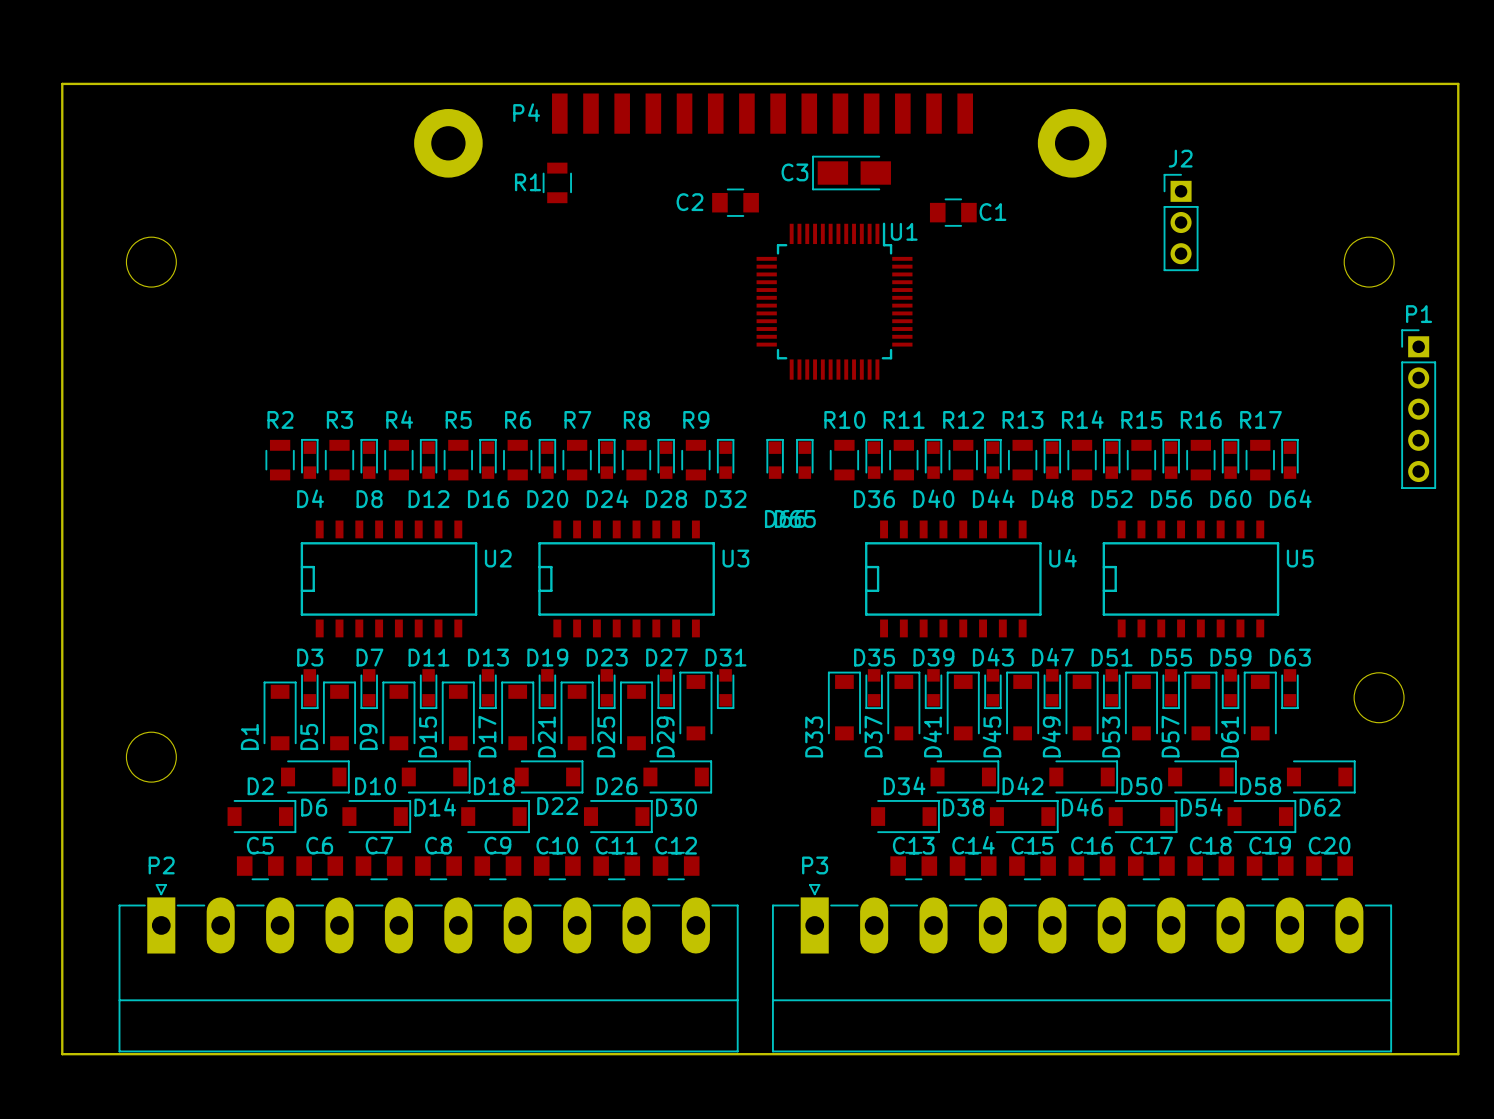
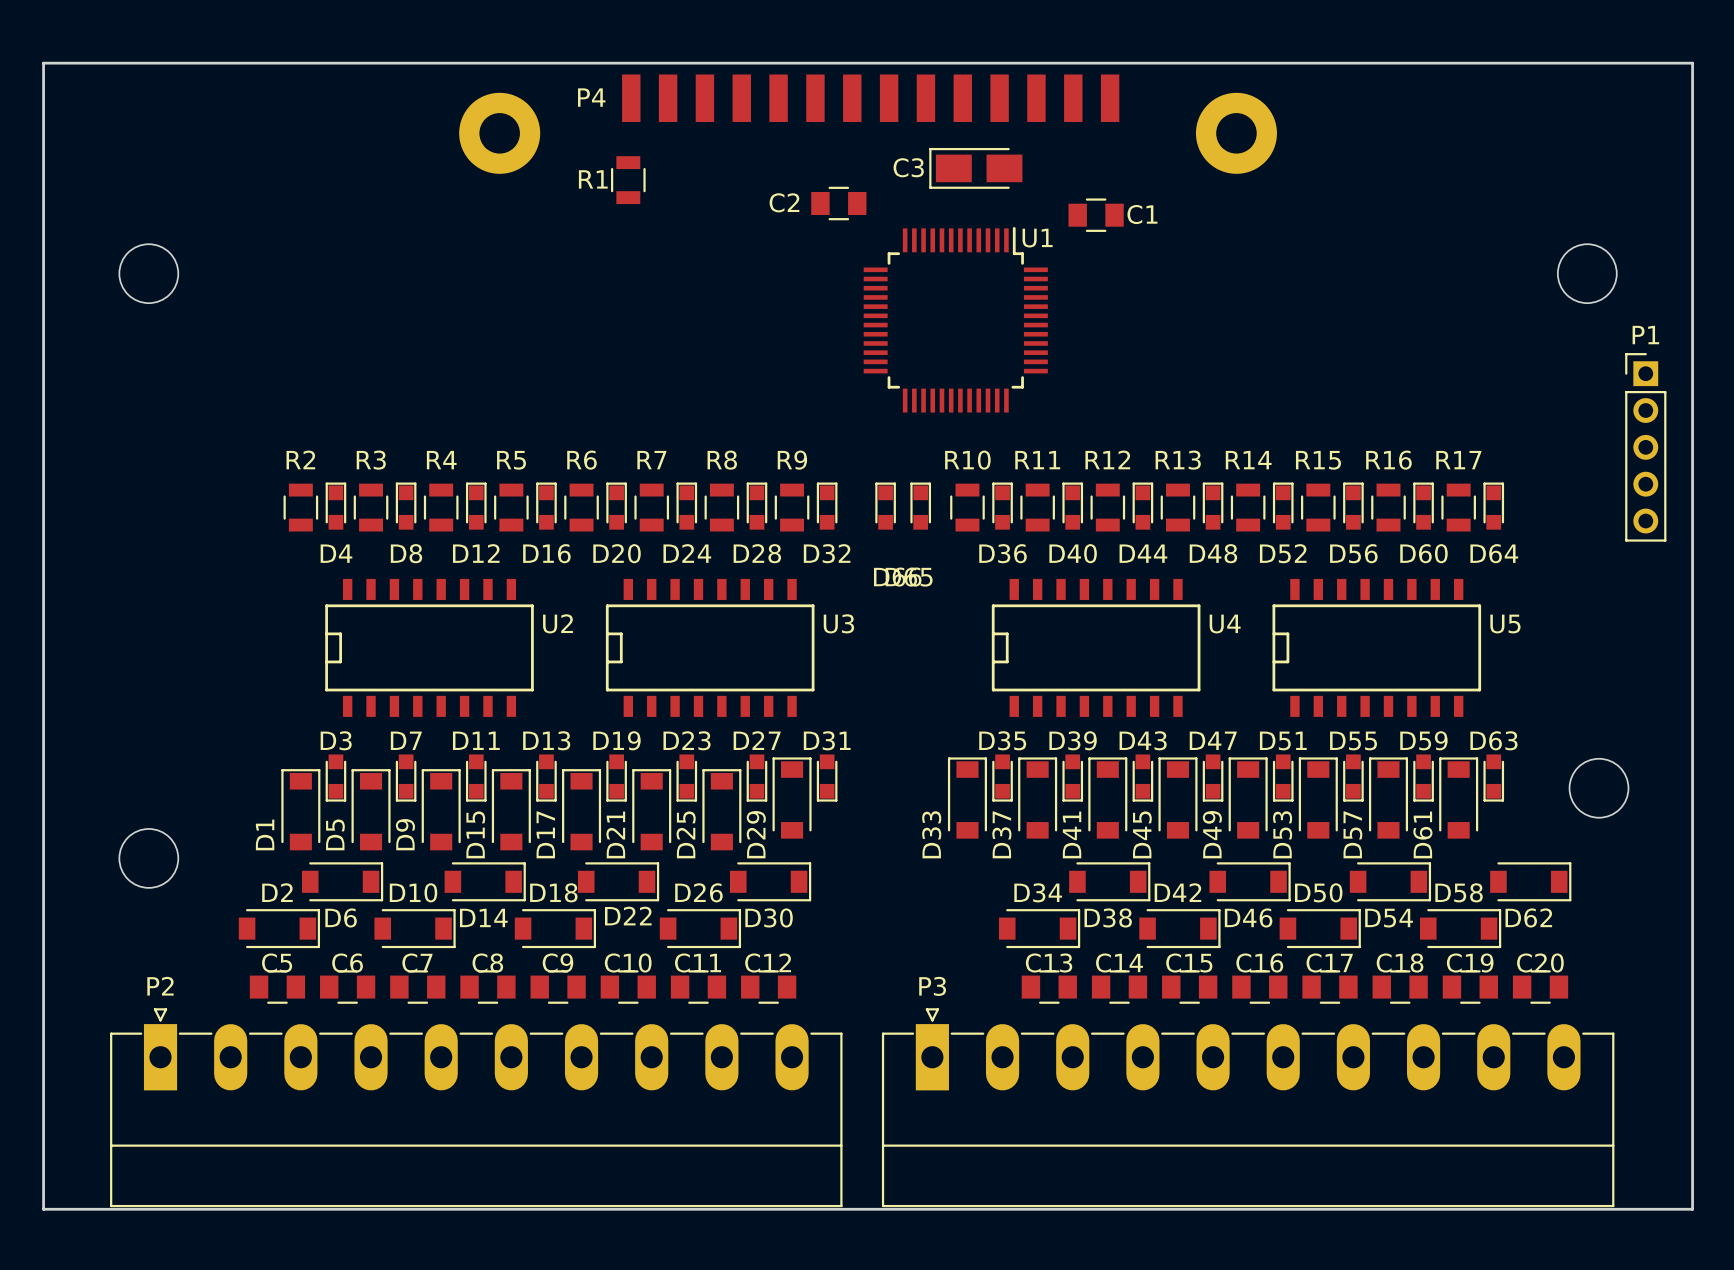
J2: (1181, 222) -> none

